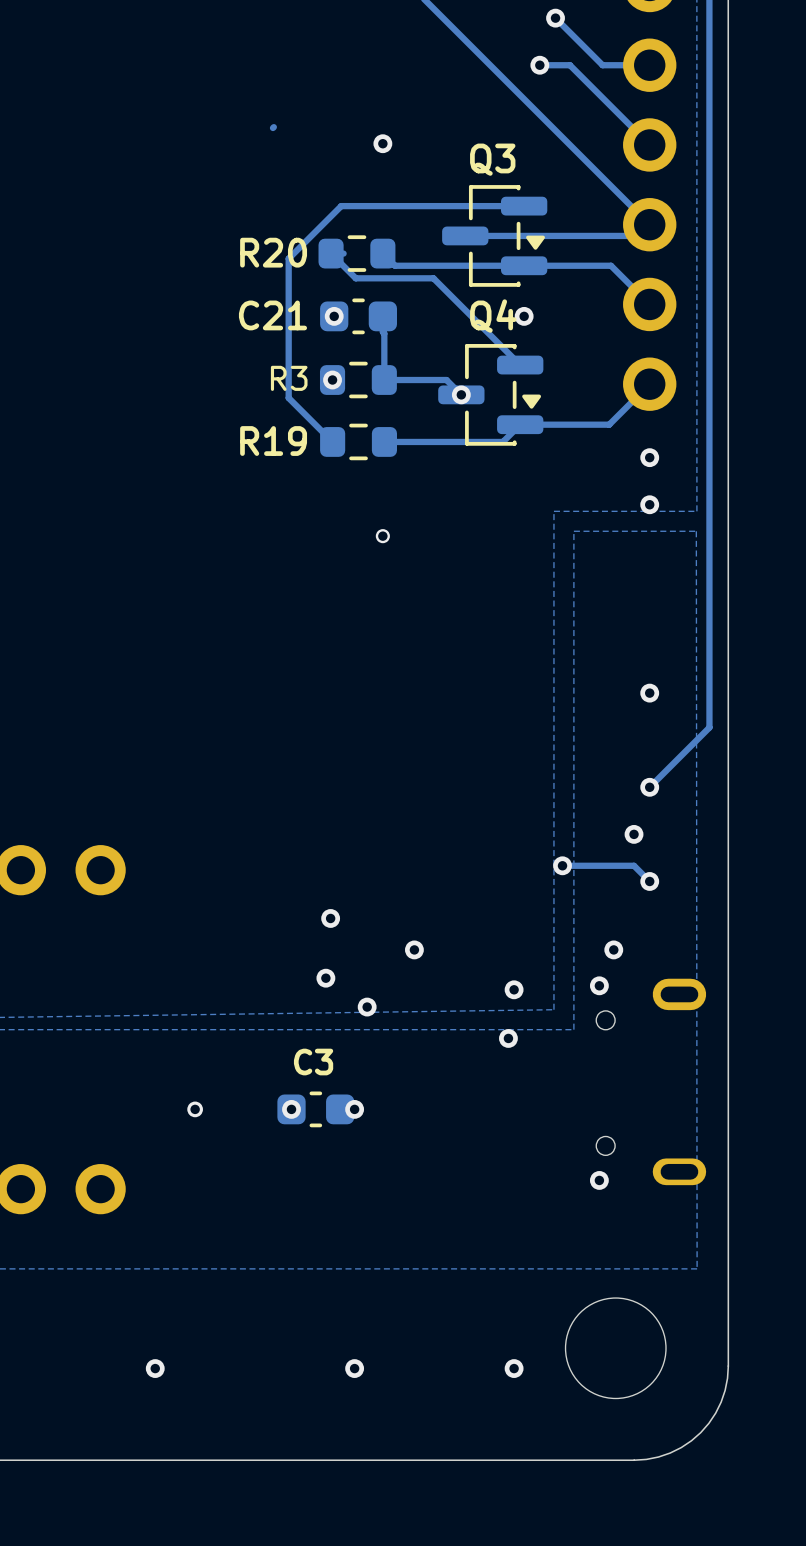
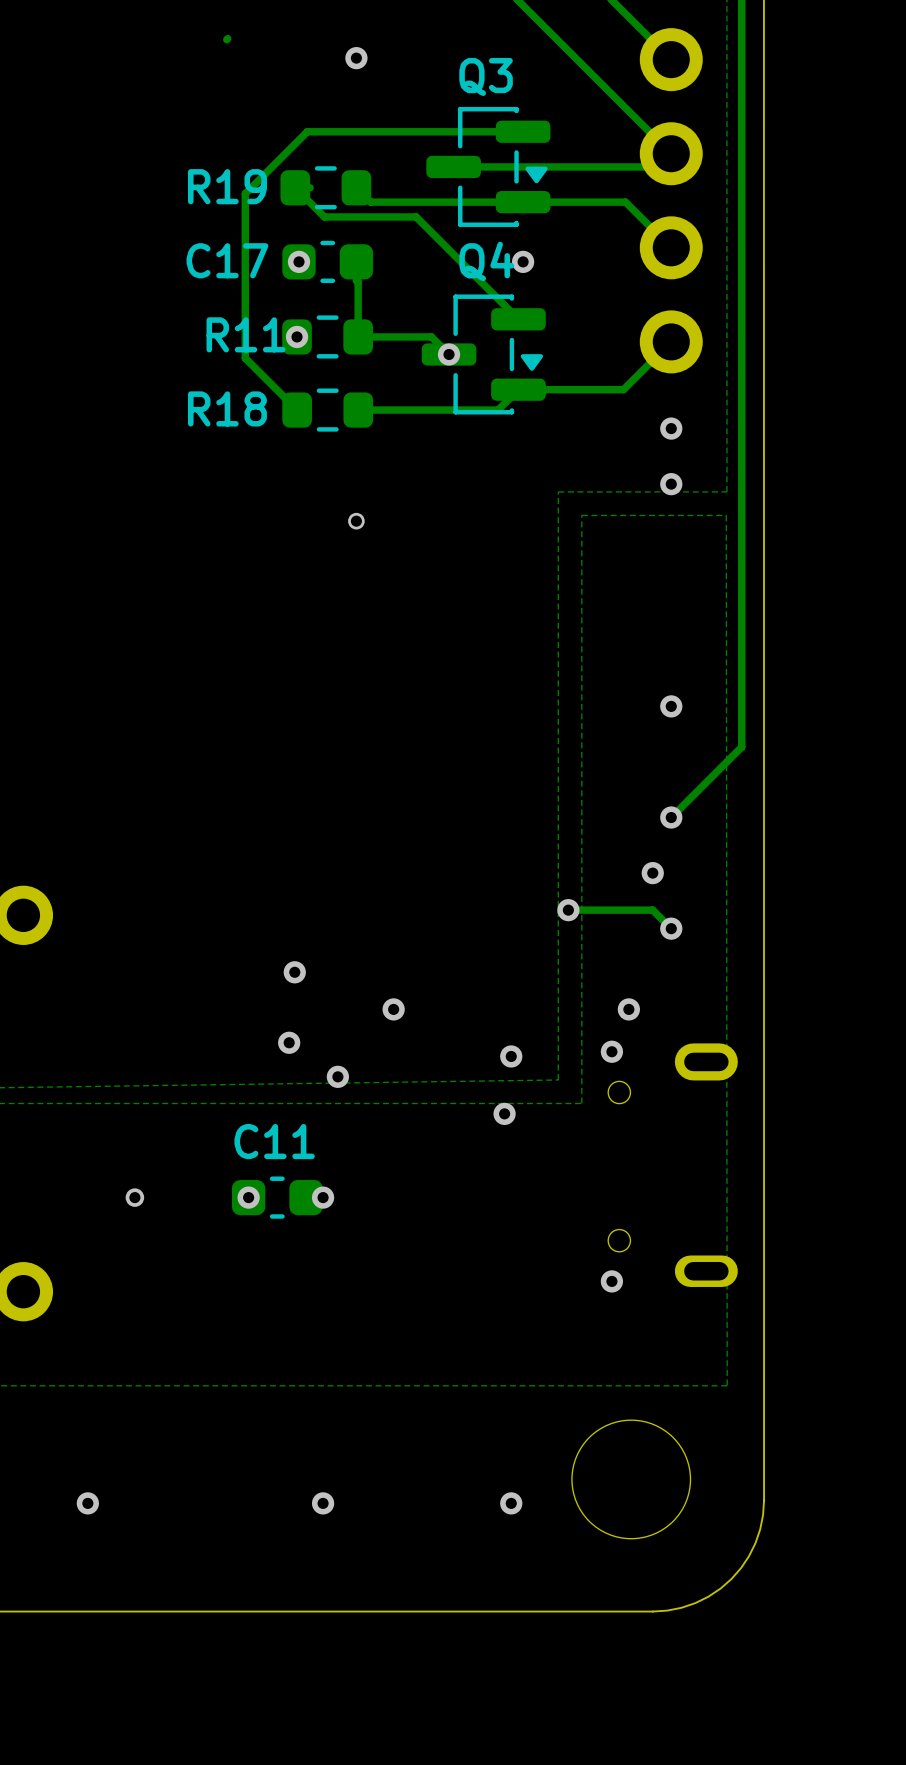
R20 name: R20 (273, 252) -> R19 (227, 186)
C21 name: C21 (272, 315) -> C17 (227, 260)
R3 name: R3 (289, 378) -> R11 (245, 334)
R19 name: R19 (273, 441) -> R18 (227, 408)
C3 name: C3 (313, 1062) -> C11 (274, 1141)

